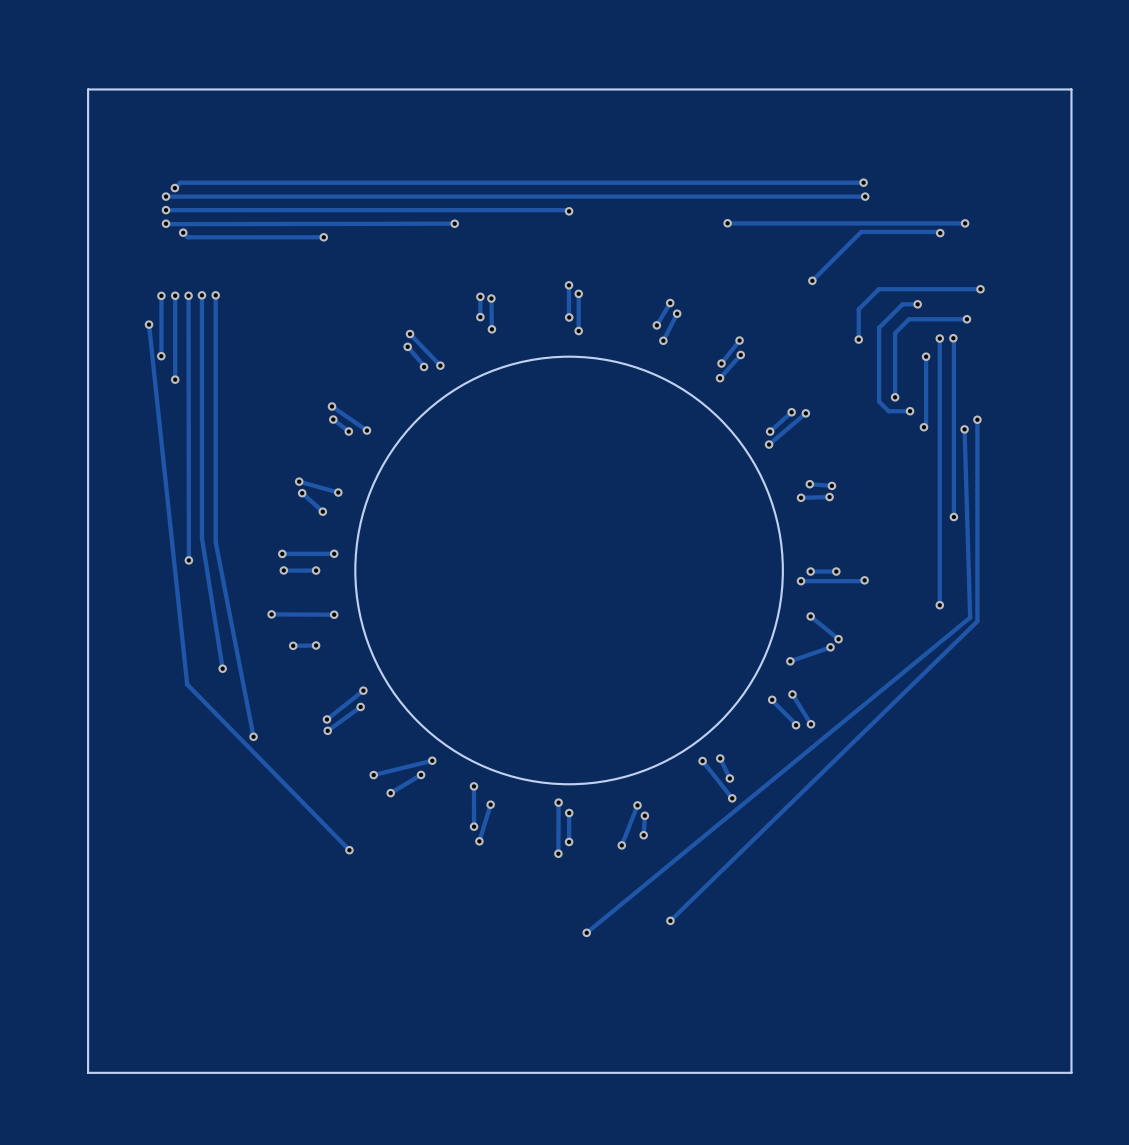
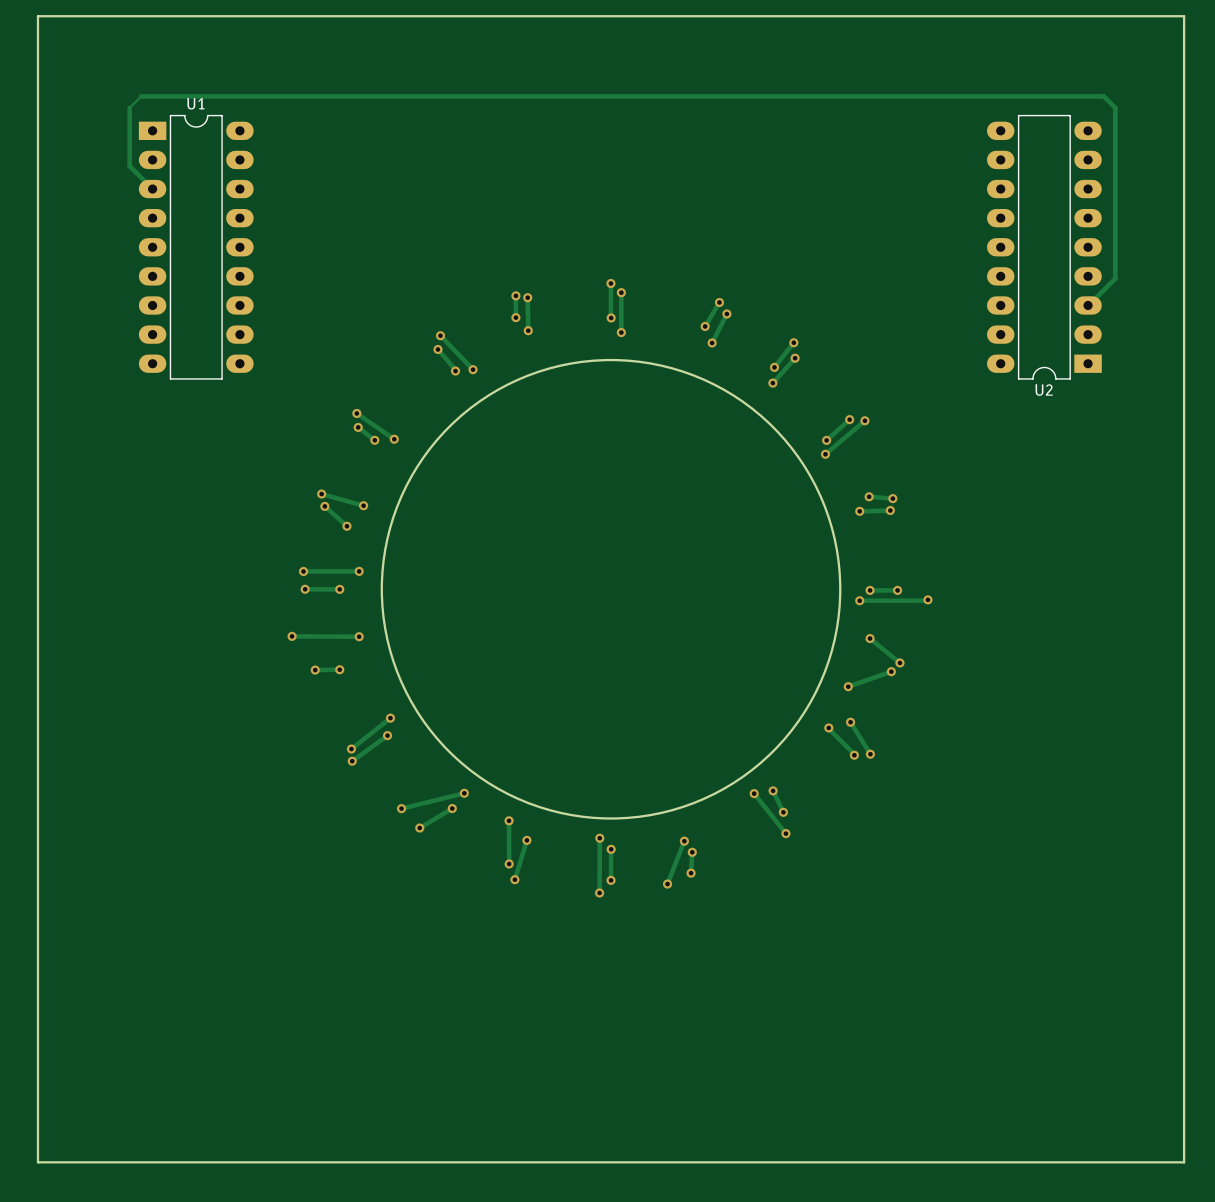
board edge: (1071, 89) (88, 89) (88, 1072) (1071, 1072) (1071, 89) -> (1184, 16) (1184, 1162) (37, 1162) (37, 16) (1184, 16)
track: (863, 182) (180, 182) (174, 188) -> none
via: (863, 182) -> none
via: (174, 188) -> none
via: (166, 196) -> none
track: (865, 196) (166, 196) -> none
via: (865, 196) -> none
track: none -> (152, 189) (129, 166) (129, 107) (141, 96) (1103, 96) (1115, 107) (1115, 278) (1090, 303)
track: (166, 210) (569, 211) -> none
via: (166, 210) -> none
via: (569, 211) -> none
via: (166, 223) -> none
track: (454, 223) (166, 223) -> none
via: (454, 223) -> none
via: (727, 223) -> none
track: (965, 223) (727, 223) -> none
via: (965, 223) -> none
track: (183, 232) (187, 237) (323, 237) -> none
via: (183, 232) -> none
track: (940, 233) (861, 231) (812, 280) -> none
via: (940, 233) -> none
via: (323, 237) -> none
U1: none -> (196, 247)
U2: none -> (1044, 247)
via: (812, 280) -> none
track: (980, 289) (878, 289) (858, 309) (858, 339) -> none
via: (980, 289) -> none
track: (161, 295) (161, 356) -> none
via: (161, 295) -> none
track: (175, 295) (175, 379) -> none
via: (175, 295) -> none
track: (188, 295) (188, 560) -> none
via: (188, 295) -> none
track: (201, 295) (201, 538) (222, 668) -> none
via: (201, 295) -> none
track: (215, 295) (215, 542) (253, 736) -> none
via: (215, 295) -> none
track: (917, 304) (902, 304) (879, 327) (879, 401) (888, 411) (910, 411) -> none
via: (917, 304) -> none
track: (966, 319) (909, 319) (895, 333) (895, 397) -> none
via: (966, 319) -> none
track: (149, 324) (187, 684) (349, 850) -> none
via: (149, 324) -> none
track: (939, 338) (939, 605) -> none
via: (939, 338) -> none
track: (953, 338) (953, 517) -> none
via: (953, 338) -> none
via: (858, 339) -> none
via: (161, 356) -> none
track: (926, 356) (926, 425) (923, 427) -> none
via: (926, 356) -> none
via: (175, 379) -> none
via: (895, 397) -> none
via: (910, 411) -> none
track: (977, 419) (977, 621) (670, 920) -> none
via: (977, 419) -> none
via: (923, 427) -> none
track: (964, 429) (970, 617) (586, 932) -> none
via: (964, 429) -> none
via: (953, 517) -> none
via: (188, 560) -> none
via: (939, 605) -> none
via: (222, 668) -> none
via: (253, 736) -> none
via: (349, 850) -> none
via: (670, 920) -> none
via: (586, 932) -> none

